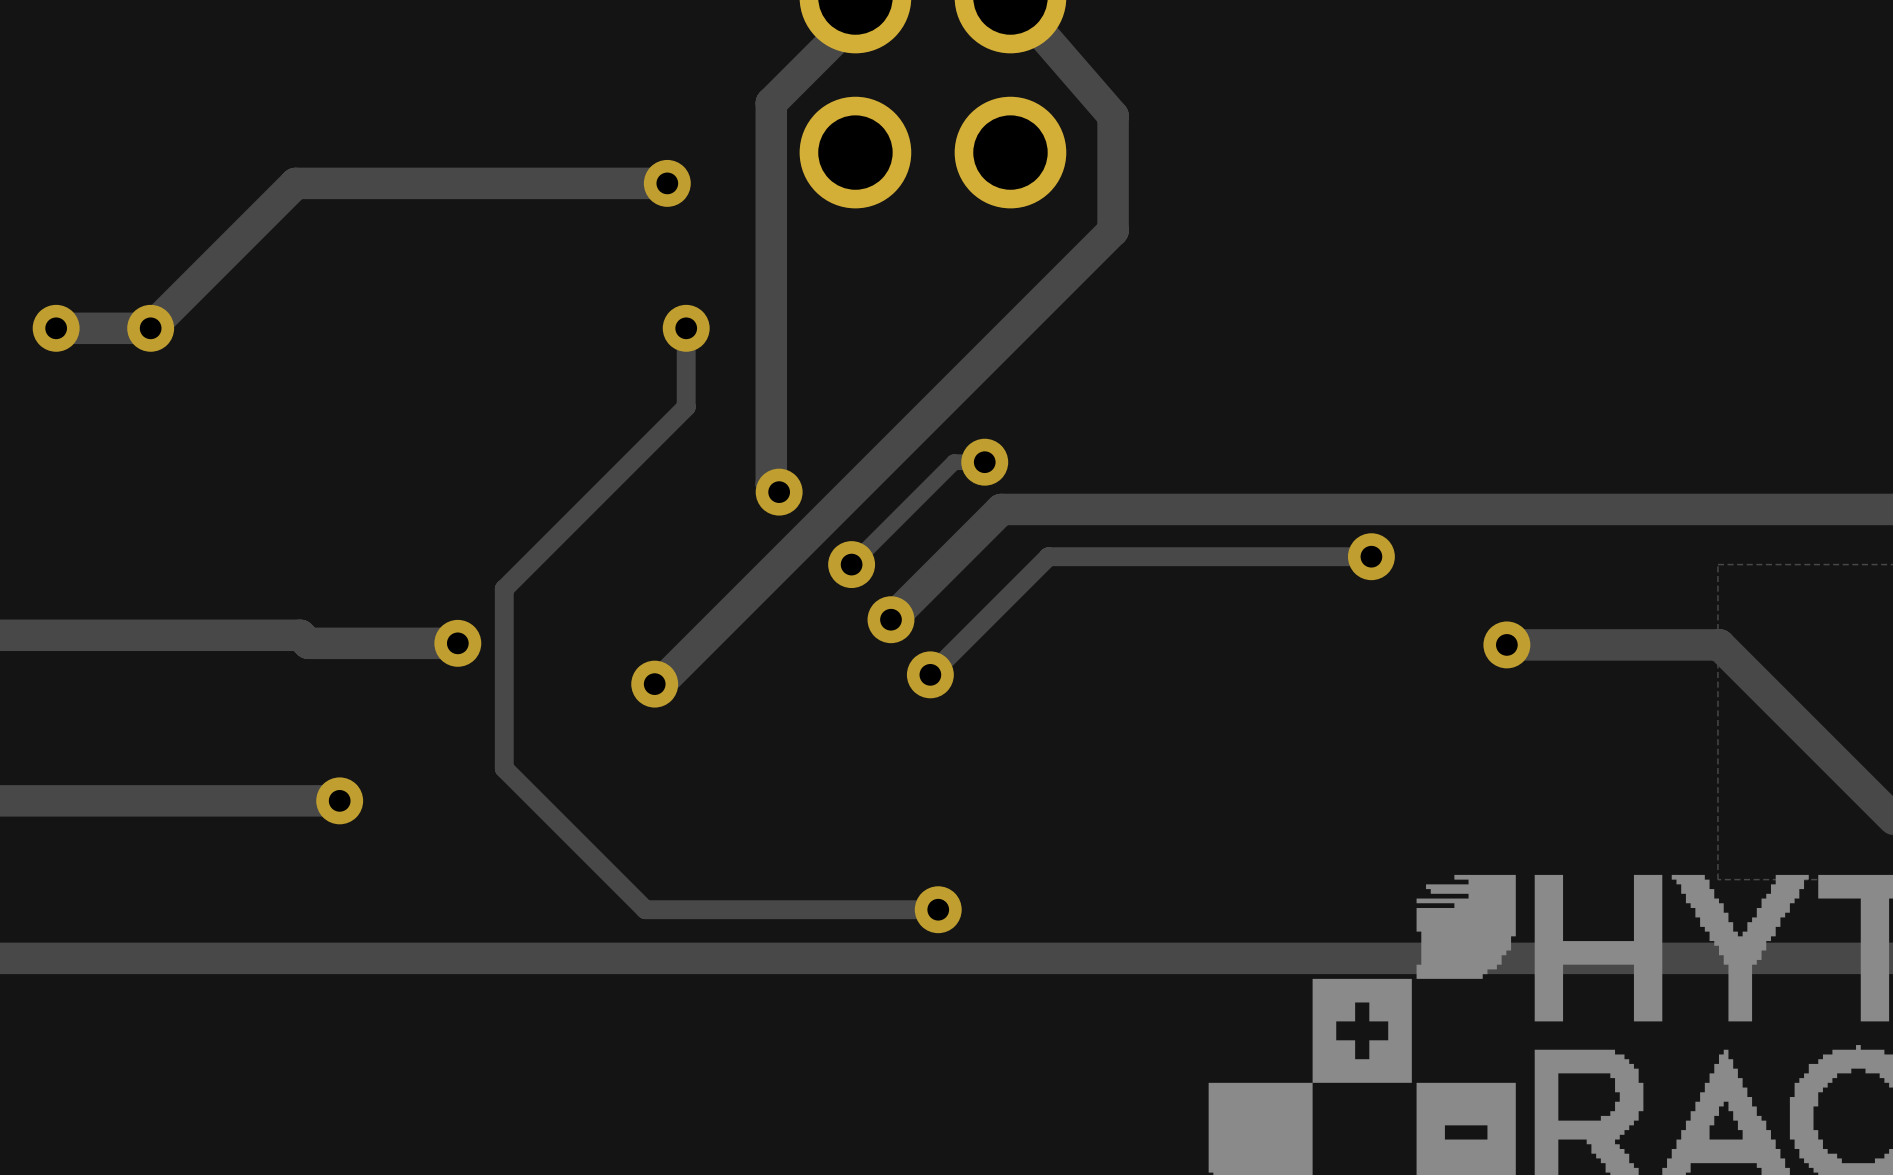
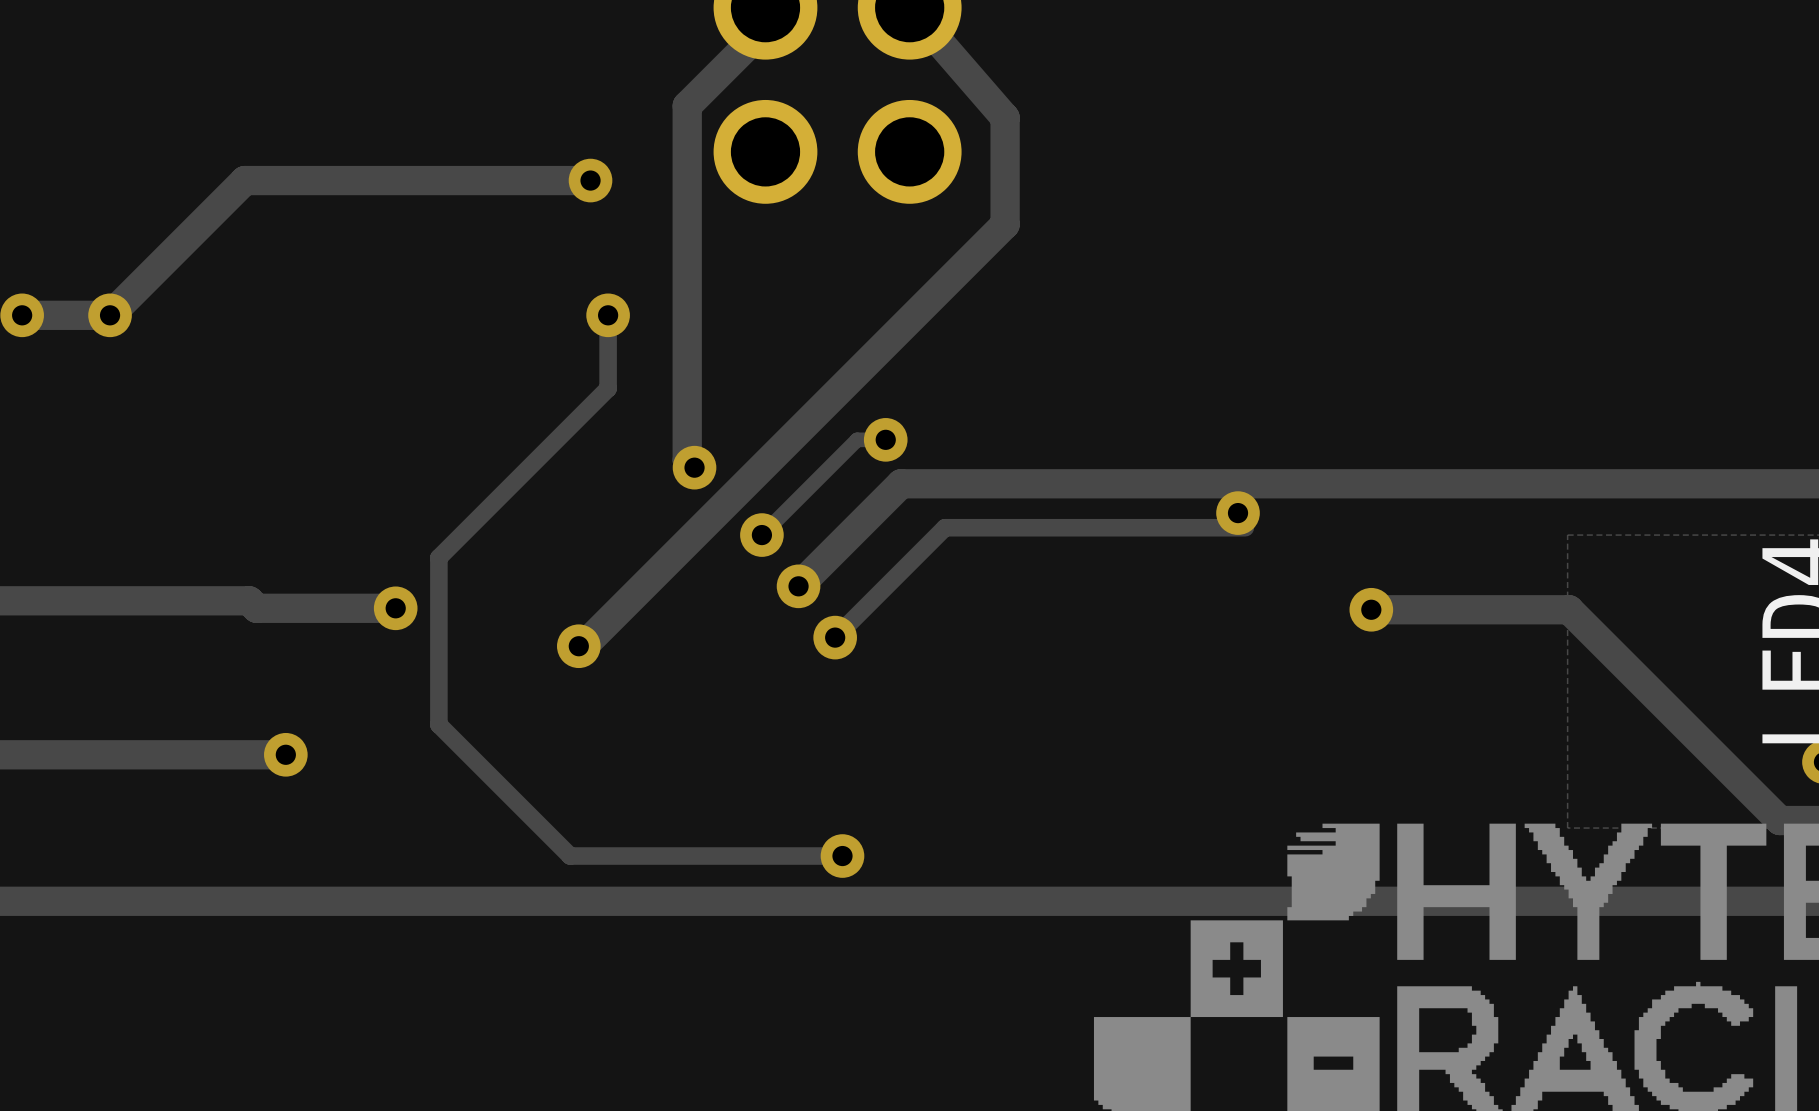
via position: (1371, 556) -> (1238, 513)

